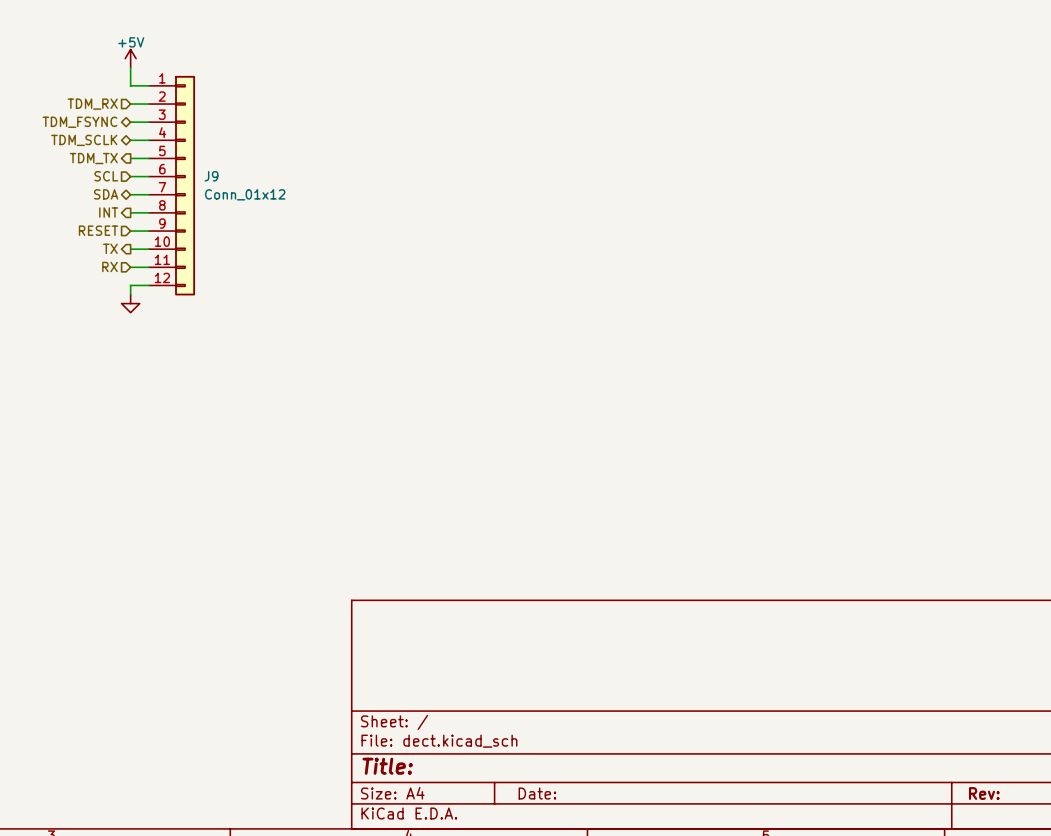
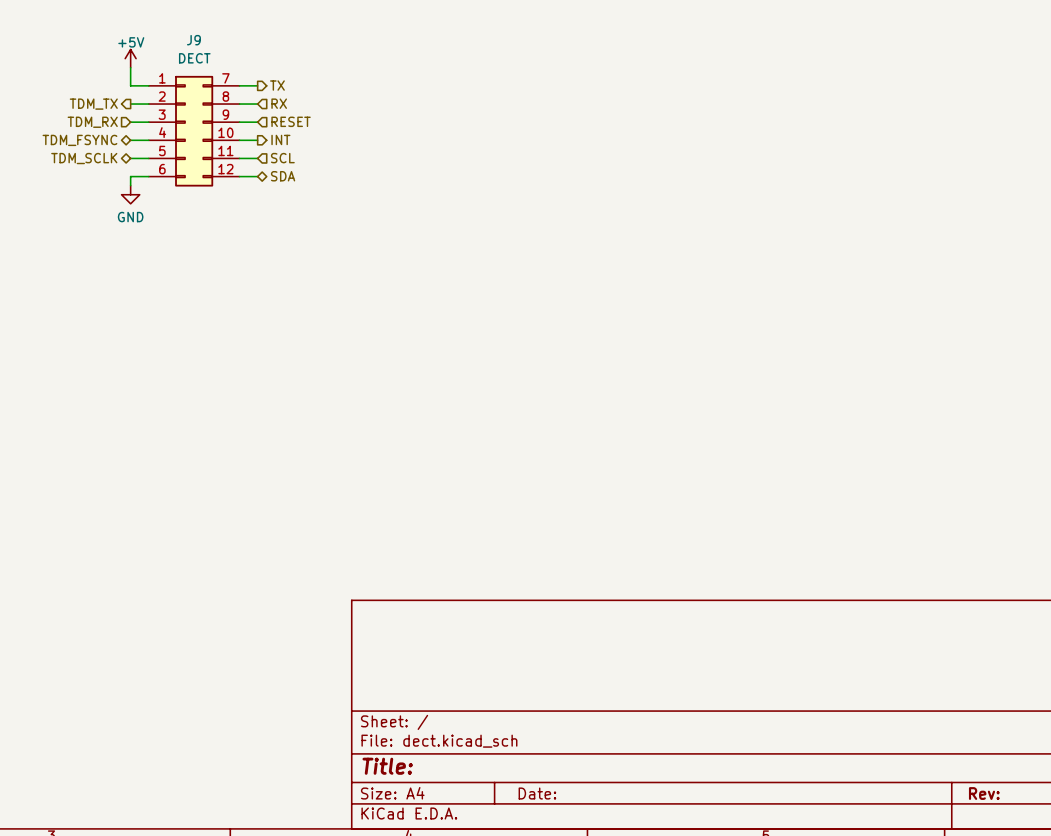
J9 symbol: [148, 75, 196, 296] -> [148, 75, 240, 187]
wire: none -> (239, 85) (257, 85)
hierarchical label: none -> TX (277, 85)
hierarchical label: none -> RX (279, 103)
hierarchical label shape: input (92, 104) -> output (93, 104)
hierarchical label: TDM_RX (92, 104) -> TDM_TX (93, 104)
hierarchical label: none -> RESET (291, 121)
hierarchical label shape: bidirectional (79, 122) -> input (92, 122)
hierarchical label: TDM_FSYNC (79, 122) -> TDM_RX (92, 122)
hierarchical label: TDM_SCLK (84, 140) -> TDM_FSYNC (79, 140)
hierarchical label shape: output (93, 158) -> bidirectional (84, 158)
hierarchical label: TDM_TX (93, 158) -> TDM_SCLK (84, 158)
hierarchical label rotation: 0° (106, 176) -> 180° (282, 158)
hierarchical label position: SCL (106, 176) -> SCL (282, 158)
wire: none -> (130, 176) (130, 185)
J9 name position: J9 (211, 176) -> J9 (193, 40)
hierarchical label rotation: 0° (106, 194) -> 180° (283, 176)
hierarchical label position: SDA (106, 194) -> SDA (283, 176)
wire: (130, 194) (148, 194) -> (239, 104) (257, 104)
power symbol: none -> GND (130, 194)
J9 value: Conn_01x12 (245, 194) -> DECT (194, 58)
hierarchical label rotation: 0° (108, 212) -> 180° (280, 139)
hierarchical label position: INT (108, 212) -> INT (280, 139)
wire: (130, 212) (148, 212) -> (239, 122) (257, 122)
hierarchical label: RESET (98, 230) -> none
wire: (130, 231) (148, 231) -> (239, 140) (257, 140)
hierarchical label: TX (110, 248) -> none
wire: (130, 249) (148, 249) -> (239, 158) (257, 158)
hierarchical label: RX (109, 266) -> none
wire: (130, 267) (148, 267) -> (239, 176) (257, 176)
wire: (148, 285) (130, 285) (130, 294) -> none
power symbol: (130, 303) -> none

